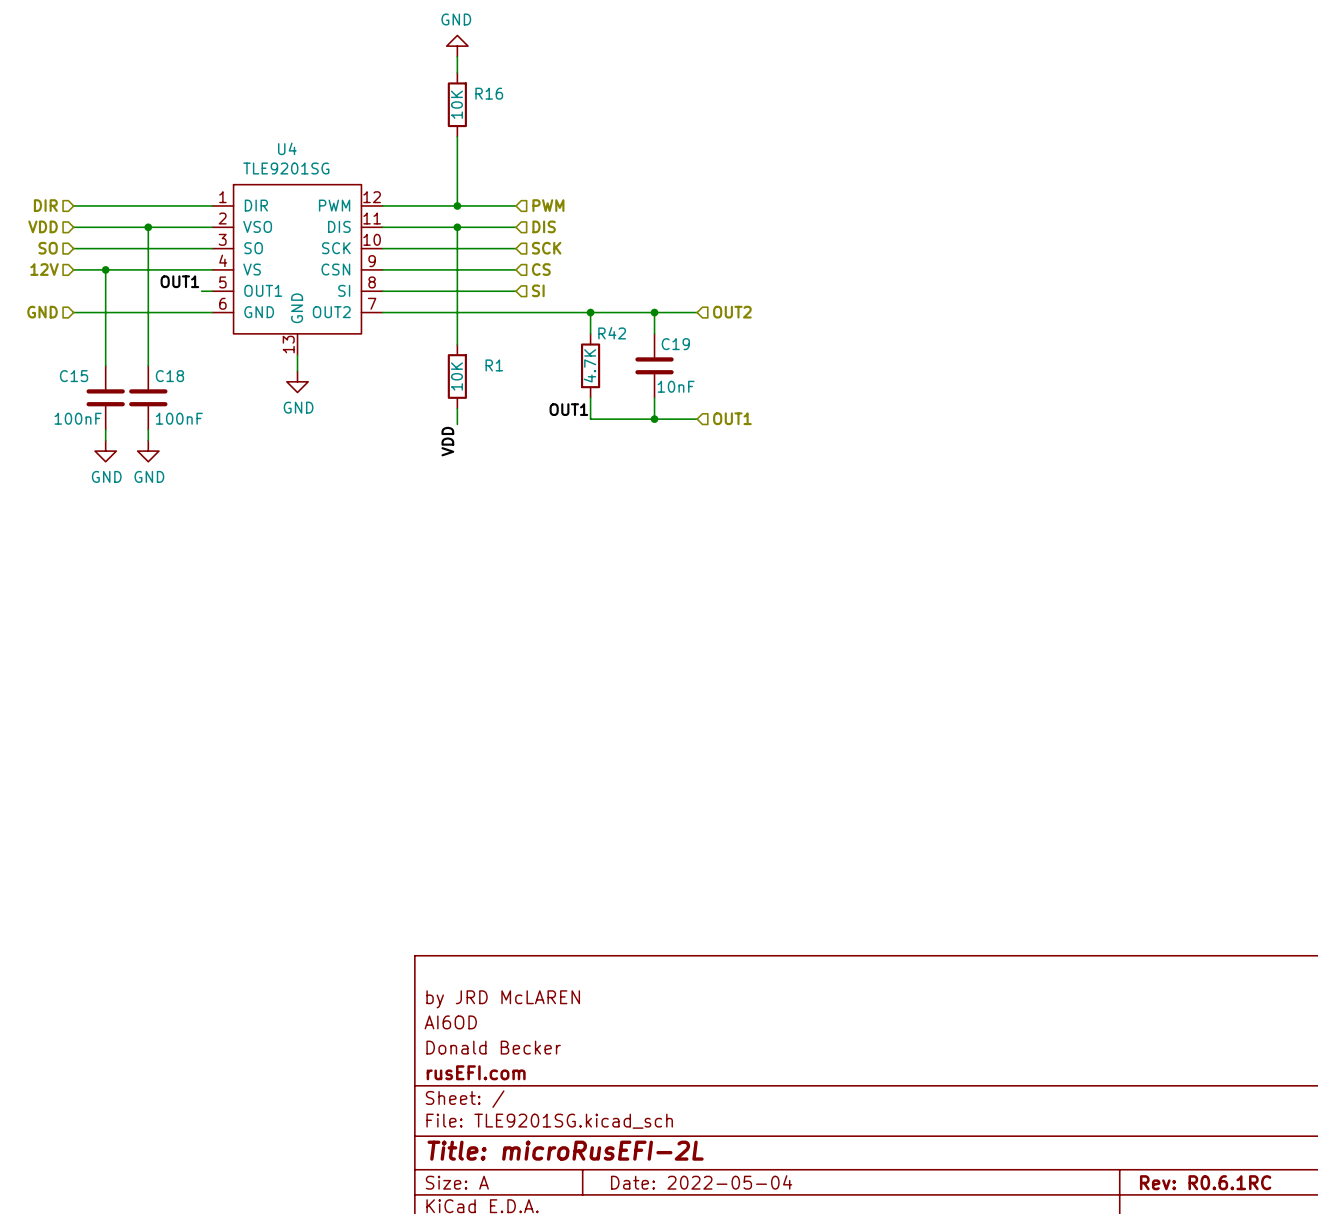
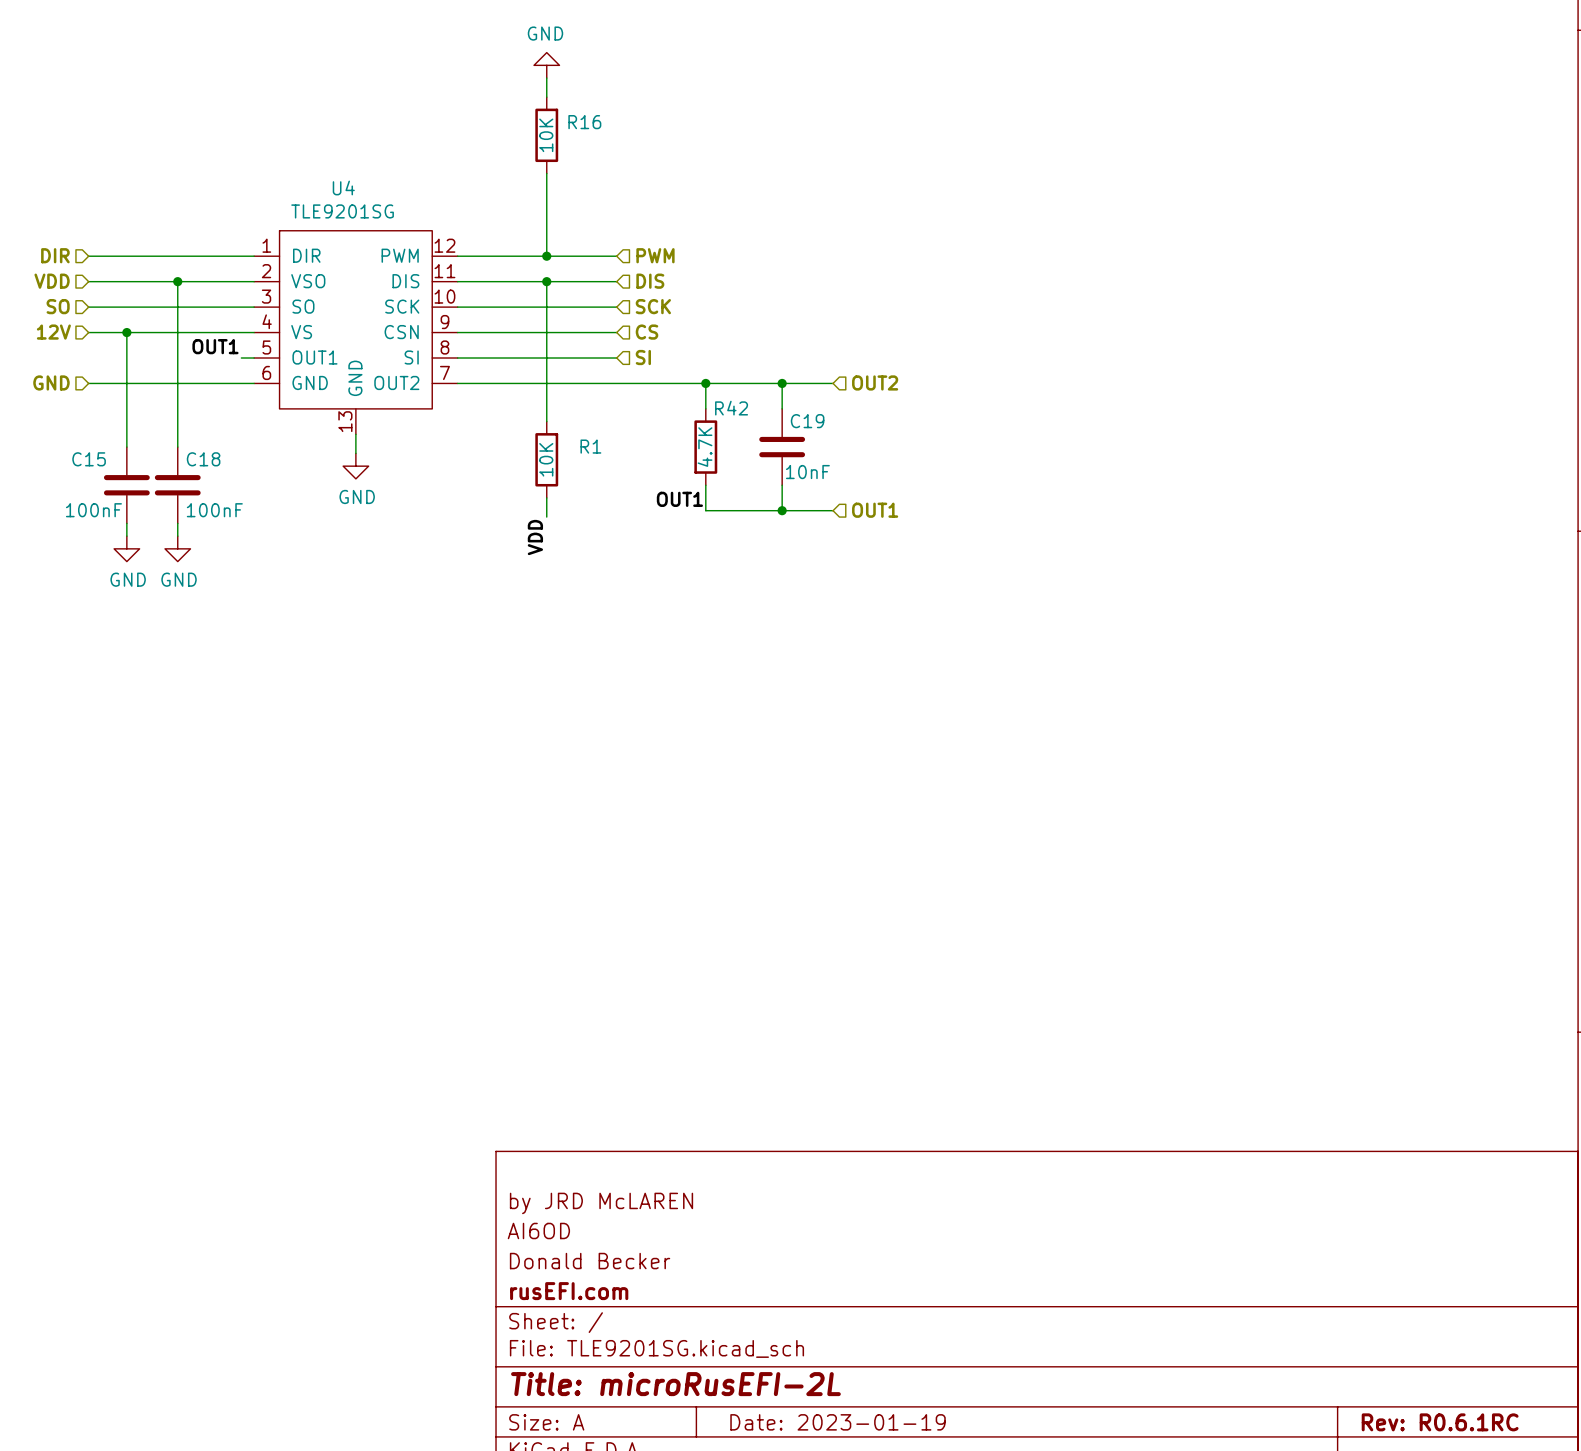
title block: Date: 2022-05-04 (701, 1182) -> Date: 2023-01-19 (838, 1422)

